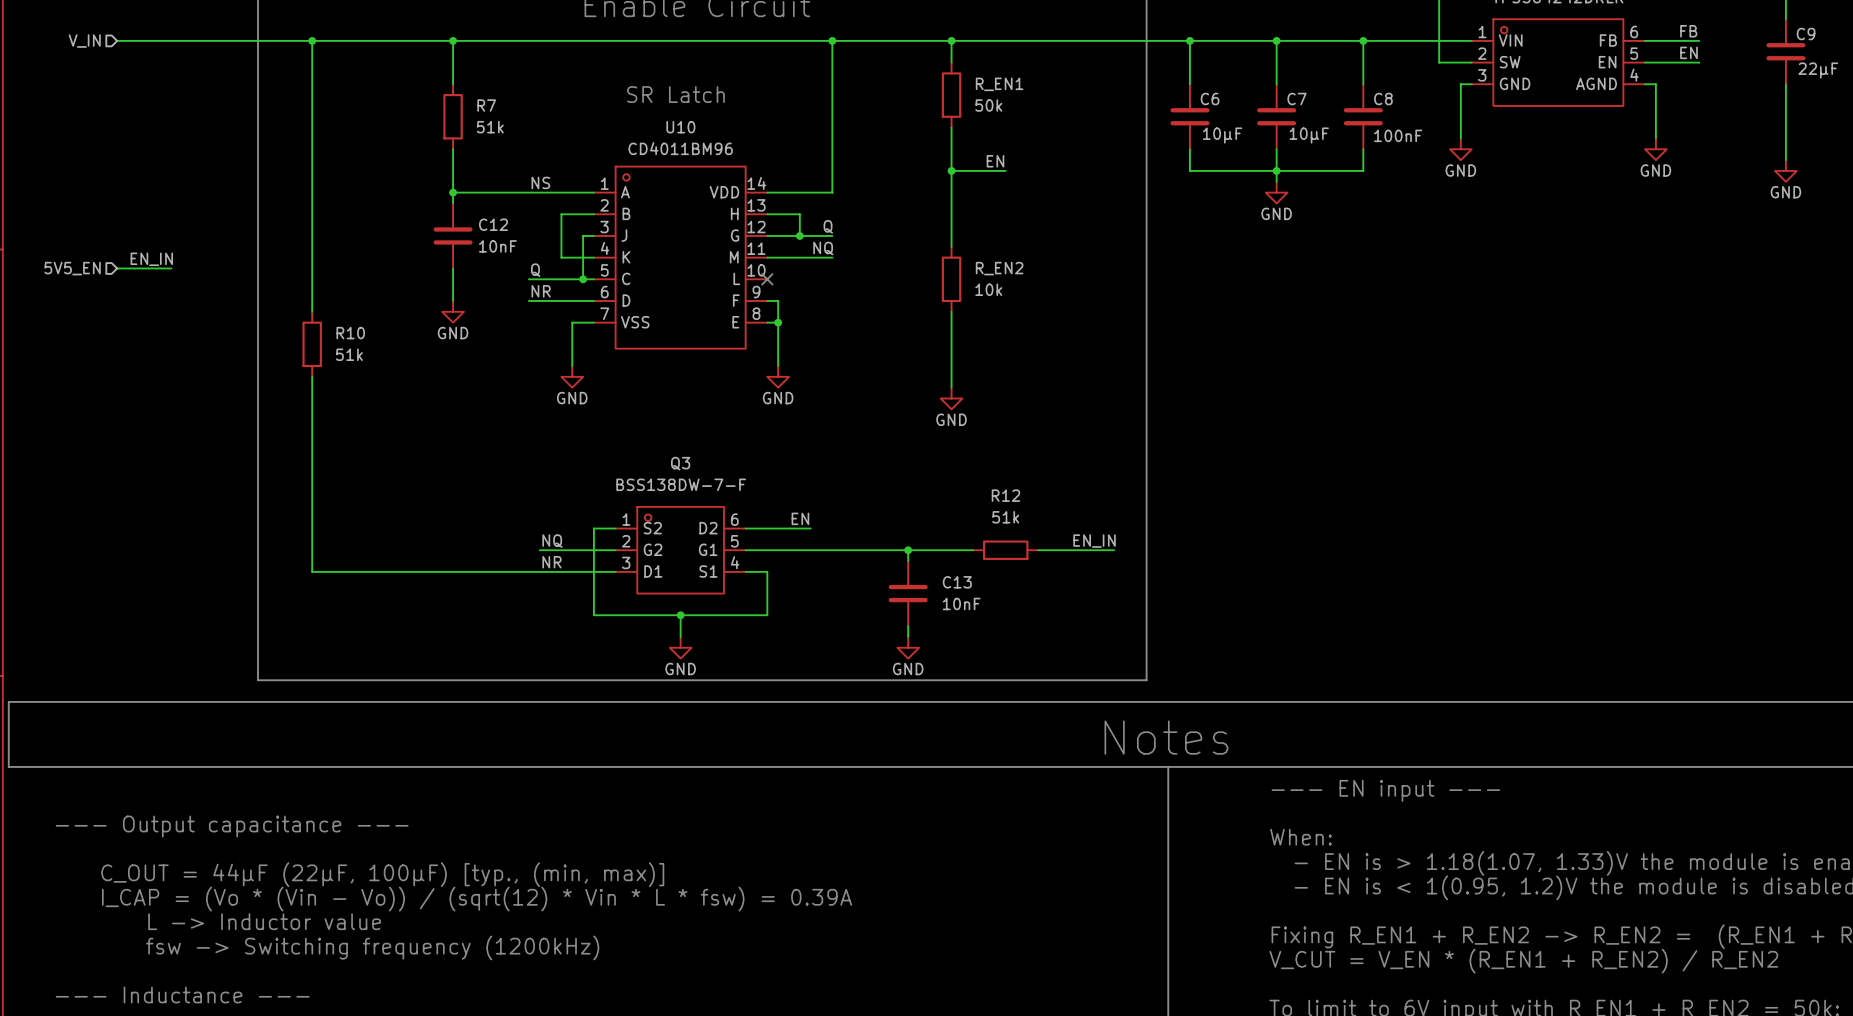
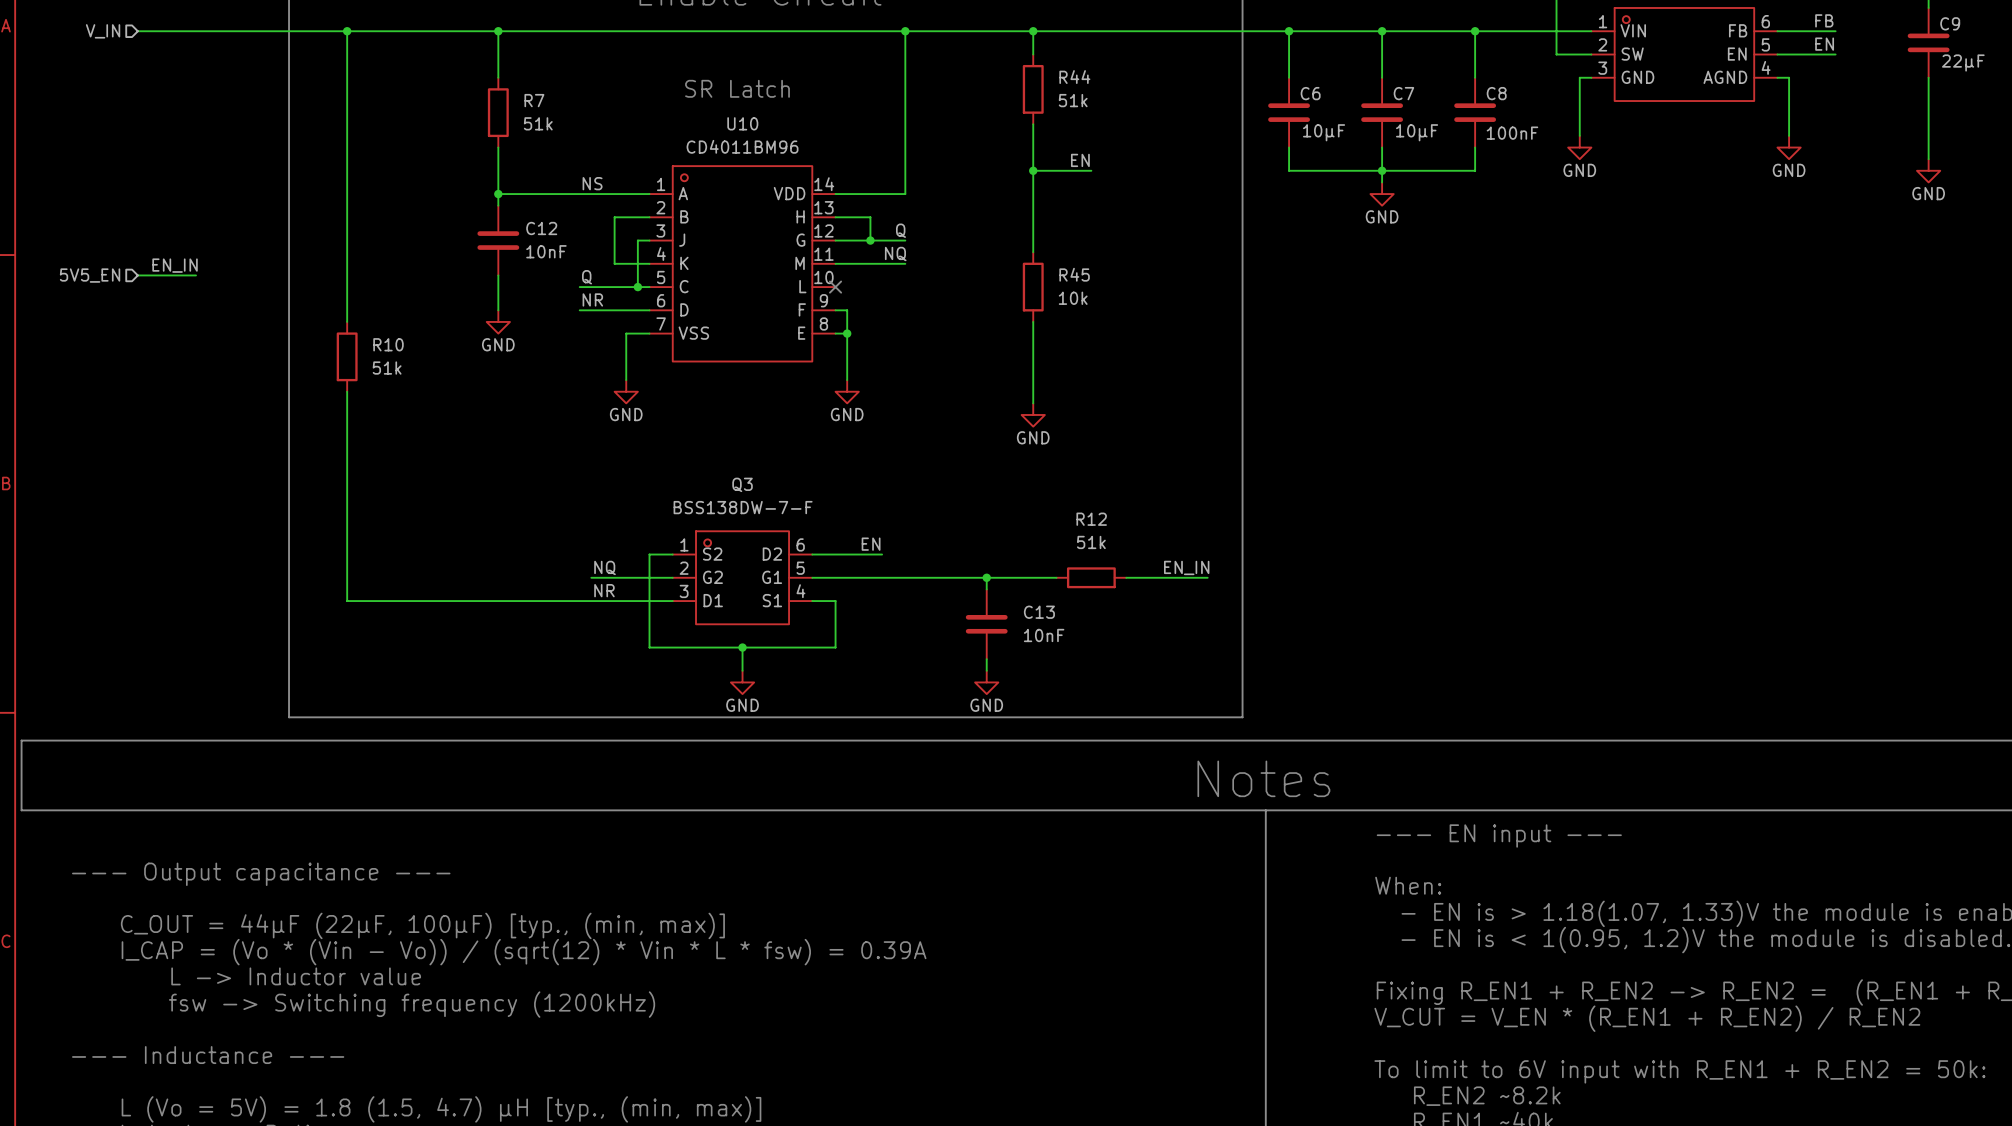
R_EN1 name: R_EN1 (999, 84) -> R44 (1074, 77)
R_EN1 value: 50k (988, 105) -> 51k (1073, 100)
R_EN2 name: R_EN2 (999, 268) -> R45 (1074, 274)

